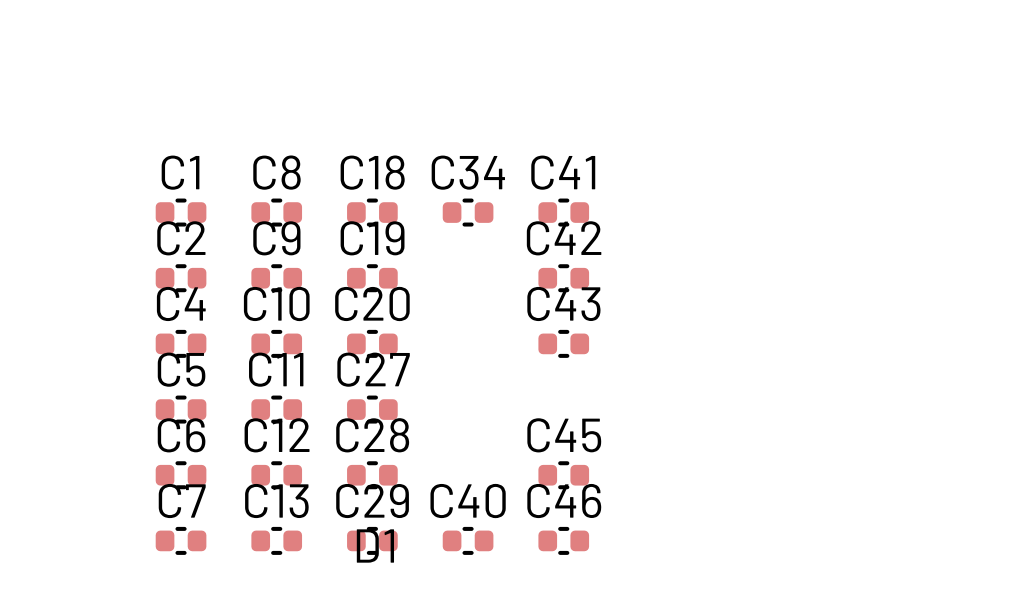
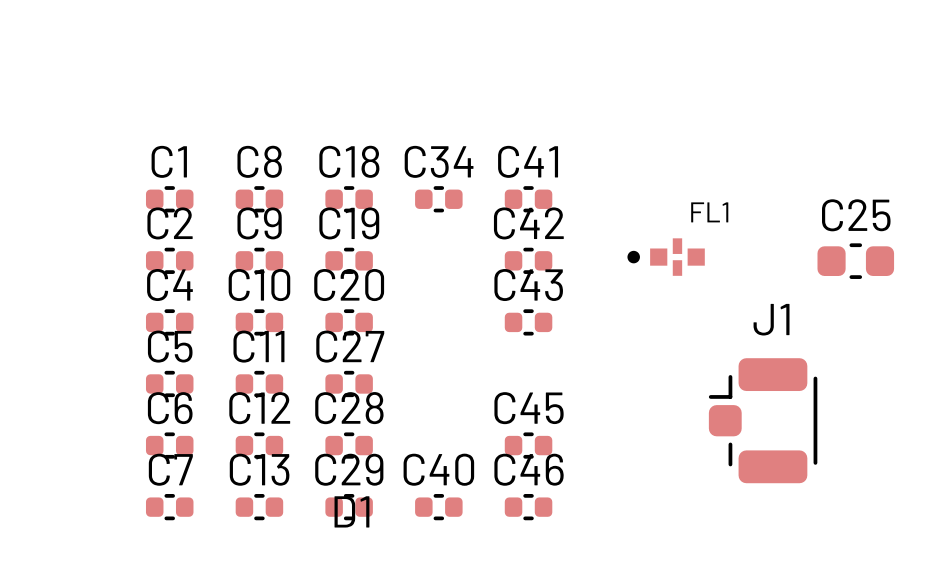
FL1: none -> (666, 257)
C25: none -> (855, 261)
J1: none -> (763, 420)

